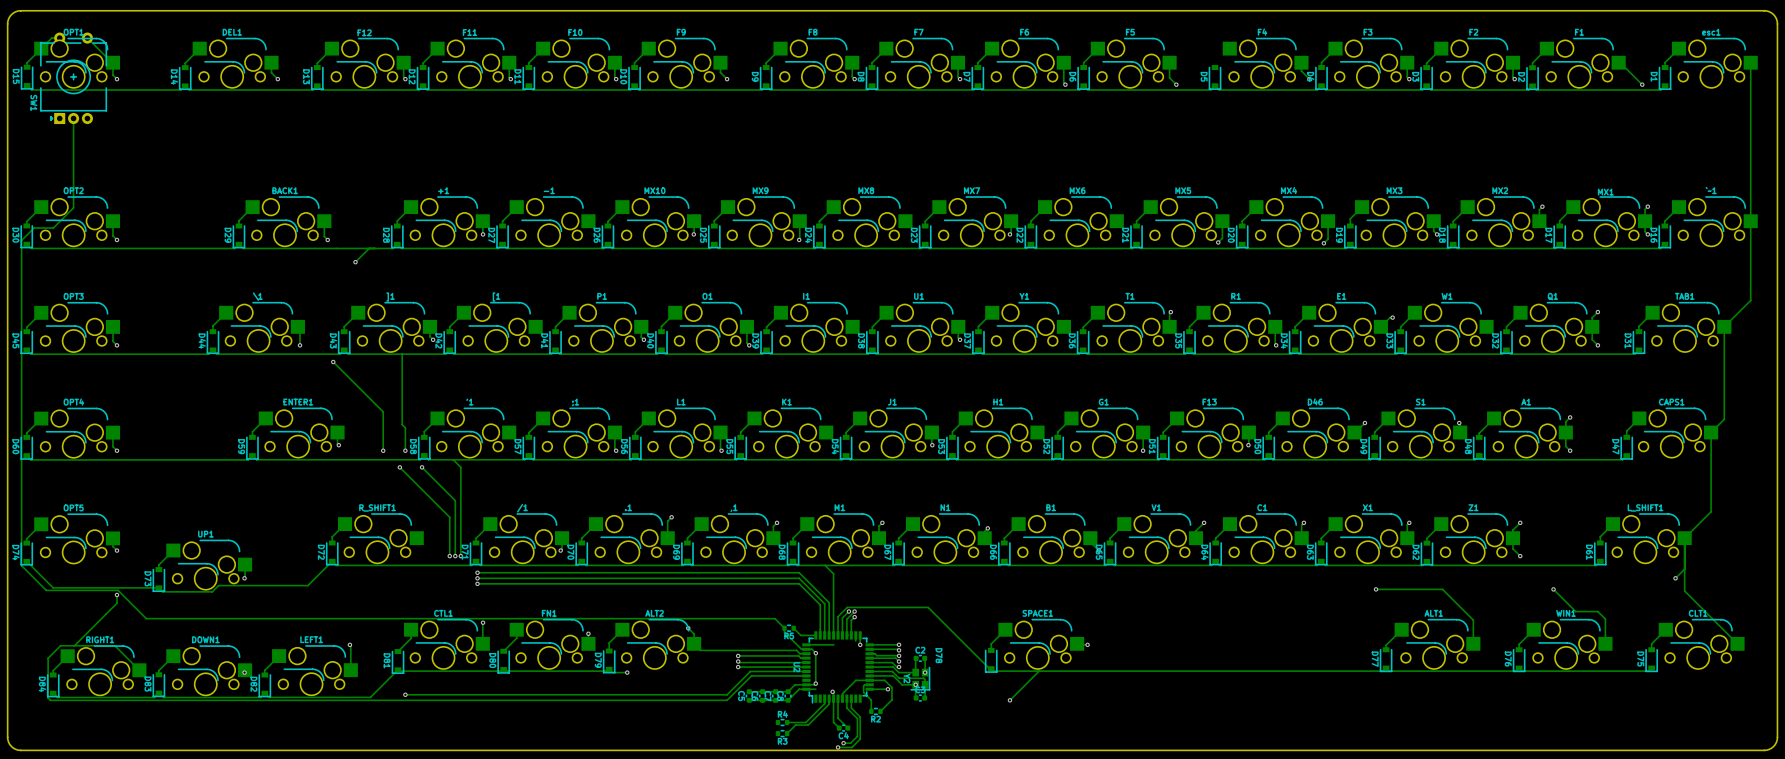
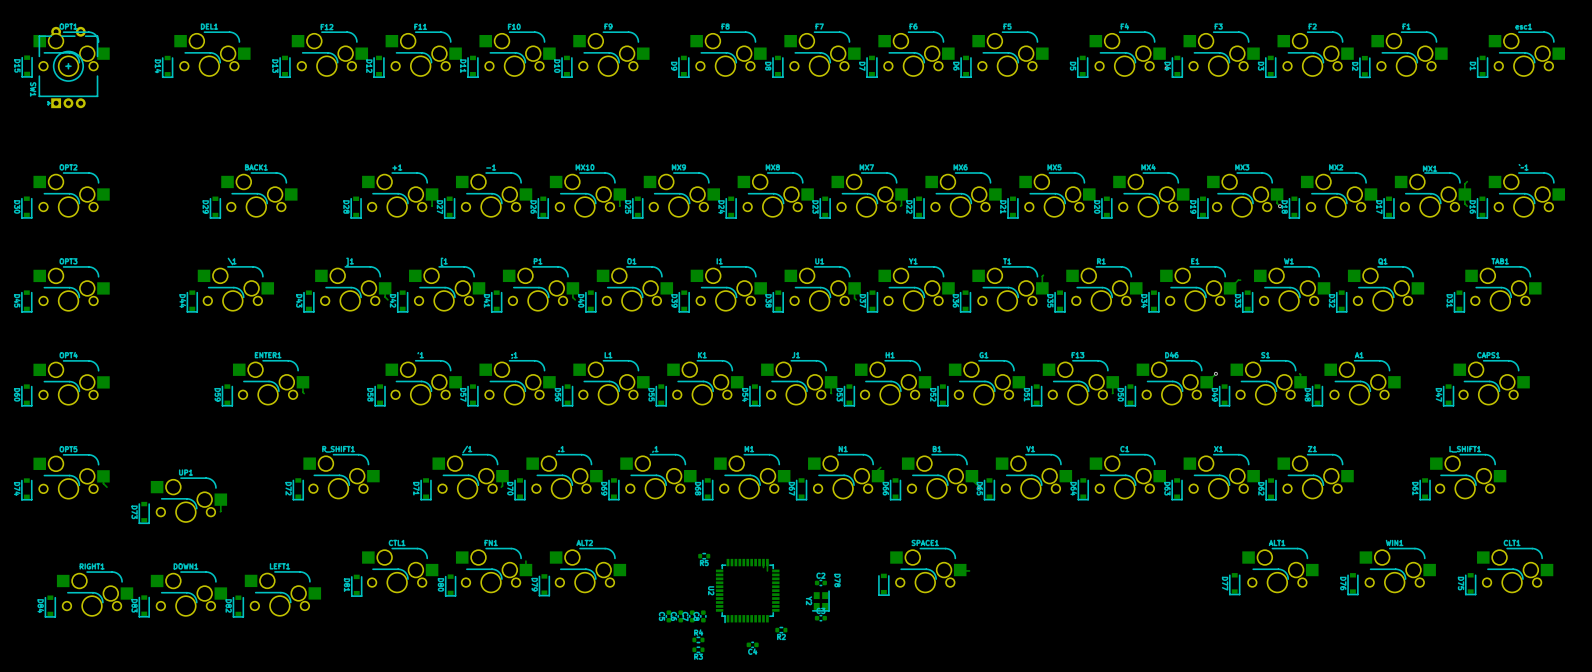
board edge: (1764, 10) (15, 11) (9, 17) (7, 23) (8, 742) (14, 748) (20, 750) (1769, 749) (1774, 745) (1777, 737) (1777, 23) (1773, 14) (1764, 10) -> none
track: (59, 38) (51, 38) (27, 62) (27, 67) -> none
track: (87, 38) (112, 62) (112, 75) (116, 79) -> none
track: (199, 48) (185, 63) (185, 67) -> none
track: (331, 48) (317, 63) (317, 67) -> none
track: (437, 48) (423, 63) (423, 67) -> none
track: (543, 48) (528, 62) (528, 67) -> none
track: (648, 48) (634, 62) (634, 67) -> none
track: (780, 48) (766, 63) (766, 67) -> none
track: (886, 48) (872, 62) (872, 67) -> none
track: (992, 48) (977, 62) (977, 67) -> none
track: (1097, 48) (1083, 62) (1083, 67) -> none
track: (1335, 48) (1321, 62) (1321, 67) -> none
track: (1441, 48) (1426, 63) (1426, 67) -> none
track: (1546, 48) (1532, 63) (1532, 67) -> none
track: (1679, 48) (1665, 62) (1665, 67) -> none
track: (271, 62) (271, 72) (277, 79) -> none
track: (403, 62) (403, 77) (405, 79) -> none
track: (509, 62) (510, 79) -> none
track: (614, 62) (616, 79) -> none
track: (720, 62) (720, 72) (727, 79) -> none
track: (852, 62) (852, 76) (854, 79) -> none
track: (958, 62) (958, 77) (960, 79) -> none
track: (1063, 62) (1065, 84) -> none
track: (1169, 62) (1169, 77) (1176, 84) -> none
track: (1301, 62) (1301, 71) (1309, 79) -> none
track: (1407, 62) (1407, 77) (1409, 79) -> none
track: (1512, 62) (1512, 77) (1514, 79) -> none
track: (1618, 62) (1642, 84) -> none
track: (1750, 62) (1750, 300) (1724, 326) (1724, 419) (1711, 432) (1711, 511) (1684, 538) (1684, 591) (1737, 643) -> none
via: (116, 79) -> none
via: (277, 79) -> none
via: (405, 79) -> none
via: (510, 79) -> none
via: (616, 79) -> none
via: (727, 79) -> none
via: (854, 79) -> none
via: (960, 79) -> none
via: (1409, 79) -> none
via: (1514, 79) -> none
via: (1065, 84) -> none
via: (1176, 84) -> none
via: (1642, 84) -> none
track: (27, 85) (31, 89) (181, 89) (185, 85) (189, 89) (313, 89) (317, 85) (321, 89) (418, 89) (423, 85) (427, 89) (524, 89) (528, 85) (532, 89) (630, 89) (634, 85) (638, 89) (762, 89) (766, 85) (770, 89) (867, 89) (872, 85) (876, 89) (973, 89) (977, 85) (981, 89) (1079, 89) (1083, 85) (1087, 89) (1210, 89) (1215, 85) (1219, 89) (1317, 89) (1321, 85) (1325, 89) (1422, 89) (1426, 85) (1430, 89) (1528, 89) (1532, 86) (1536, 89) (1660, 89) (1665, 85) -> none
track: (73, 118) (73, 207) (53, 228) (34, 228) (21, 240) (21, 565) (46, 590) (118, 590) (146, 618) (774, 618) (784, 628) (784, 632) (801, 649) (811, 649) (815, 653) -> none
track: (1542, 206) (1539, 209) (1539, 221) -> none
via: (1542, 206) -> none
via: (1647, 206) -> none
track: (41, 207) (26, 221) (26, 225) -> none
track: (252, 207) (238, 220) (238, 226) -> none
track: (411, 207) (397, 220) (397, 226) -> none
track: (516, 207) (502, 221) (502, 226) -> none
track: (622, 207) (607, 221) (607, 226) -> none
track: (728, 207) (714, 220) (714, 226) -> none
track: (833, 207) (819, 221) (819, 226) -> none
track: (939, 207) (925, 221) (925, 226) -> none
track: (1045, 207) (1030, 221) (1030, 226) -> none
track: (1150, 207) (1136, 221) (1136, 226) -> none
track: (1256, 207) (1242, 221) (1242, 226) -> none
track: (1362, 207) (1350, 218) (1350, 226) -> none
track: (1467, 207) (1453, 221) (1453, 226) -> none
track: (1573, 207) (1559, 220) (1559, 226) -> none
track: (1679, 207) (1664, 221) (1664, 226) -> none
track: (112, 221) (112, 235) (116, 239) -> none
track: (324, 221) (324, 236) (327, 239) -> none
track: (799, 221) (799, 239) -> none
track: (1222, 221) (1222, 238) (1218, 242) -> none
track: (1328, 221) (1328, 239) (1323, 243) -> none
via: (483, 234) -> none
via: (693, 234) -> none
via: (1009, 234) -> none
via: (1647, 234) -> none
via: (116, 239) -> none
via: (327, 239) -> none
via: (799, 239) -> none
via: (1218, 242) -> none
via: (1323, 243) -> none
track: (26, 244) (30, 248) (234, 248) (238, 244) (243, 248) (393, 248) (397, 244) (401, 248) (498, 248) (502, 244) (506, 248) (603, 248) (607, 244) (612, 248) (710, 248) (714, 244) (718, 248) (815, 248) (819, 244) (823, 248) (921, 248) (925, 244) (929, 248) (1026, 248) (1030, 244) (1035, 248) (1132, 248) (1136, 244) (1140, 248) (1238, 248) (1242, 244) (1246, 248) (1346, 248) (1350, 244) (1354, 248) (1449, 248) (1453, 244) (1457, 248) (1555, 248) (1559, 244) (1563, 248) (1660, 248) (1664, 244) -> none
track: (369, 248) (355, 262) -> none
via: (355, 262) -> none
track: (41, 312) (26, 327) (26, 331) -> none
track: (226, 312) (212, 325) (212, 331) -> none
track: (358, 312) (344, 326) (344, 331) -> none
track: (463, 312) (449, 326) (449, 331) -> none
track: (569, 312) (555, 326) (555, 331) -> none
track: (675, 312) (661, 326) (661, 331) -> none
track: (780, 312) (766, 327) (766, 331) -> none
track: (886, 312) (872, 326) (872, 331) -> none
track: (992, 312) (978, 326) (978, 331) -> none
track: (1097, 312) (1083, 327) (1083, 331) -> none
via: (1170, 312) -> none
track: (1203, 312) (1189, 326) (1189, 331) -> none
track: (1309, 312) (1295, 326) (1295, 331) -> none
track: (1414, 312) (1400, 326) (1400, 331) -> none
track: (1520, 312) (1506, 326) (1506, 331) -> none
track: (1597, 312) (1592, 317) (1592, 339) (1597, 345) -> none
via: (1597, 312) -> none
track: (1652, 312) (1638, 326) (1638, 331) -> none
via: (1392, 317) -> none
track: (112, 326) (112, 341) (116, 345) -> none
track: (297, 326) (300, 328) (300, 345) -> none
track: (746, 326) (746, 343) (749, 345) -> none
track: (1275, 326) (1276, 345) -> none
via: (433, 339) -> none
via: (643, 339) -> none
via: (960, 339) -> none
via: (116, 345) -> none
via: (300, 345) -> none
via: (749, 345) -> none
via: (1276, 345) -> none
via: (1597, 345) -> none
track: (1638, 349) (1634, 354) (1510, 354) (1506, 349) (1502, 354) (1404, 354) (1400, 349) (1396, 354) (1299, 354) (1295, 349) (1291, 354) (1193, 354) (1189, 349) (1185, 354) (1087, 354) (1083, 349) (1078, 354) (982, 354) (978, 349) (974, 354) (876, 354) (872, 349) (868, 354) (770, 354) (766, 349) (762, 354) (665, 354) (661, 349) (657, 354) (559, 354) (555, 349) (551, 354) (453, 354) (449, 349) (445, 354) (348, 354) (344, 349) (340, 354) (217, 354) (212, 349) (208, 354) (30, 354) (26, 349) -> none
track: (402, 354) (402, 424) (405, 427) (405, 450) -> none
track: (333, 361) (383, 411) (383, 450) -> none
via: (333, 361) -> none
track: (1570, 417) (1565, 421) (1565, 446) (1570, 450) -> none
via: (1570, 417) -> none
track: (41, 418) (26, 433) (26, 437) -> none
track: (265, 418) (252, 431) (252, 437) -> none
track: (437, 418) (424, 431) (424, 437) -> none
track: (543, 418) (528, 432) (528, 437) -> none
track: (648, 418) (635, 431) (635, 437) -> none
track: (754, 418) (740, 432) (740, 437) -> none
track: (860, 418) (846, 432) (846, 437) -> none
track: (965, 418) (952, 431) (952, 437) -> none
track: (1071, 418) (1057, 432) (1057, 437) -> none
track: (1177, 418) (1163, 432) (1163, 437) -> none
track: (1282, 418) (1268, 432) (1268, 437) -> none
track: (1388, 418) (1374, 432) (1374, 437) -> none
track: (1494, 418) (1479, 433) (1479, 437) -> none
track: (1639, 418) (1626, 431) (1626, 437) -> none
via: (1459, 423) -> none
track: (112, 432) (112, 446) (116, 450) -> none
track: (614, 432) (616, 450) -> none
track: (720, 432) (721, 450) -> none
track: (1143, 432) (1143, 450) -> none
via: (338, 445) -> none
via: (932, 445) -> none
via: (1248, 445) -> none
via: (116, 450) -> none
via: (383, 450) -> none
via: (405, 450) -> none
via: (616, 450) -> none
via: (721, 450) -> none
via: (1143, 450) -> none
via: (1570, 450) -> none
track: (1626, 455) (1622, 459) (1483, 459) (1479, 455) (1475, 459) (1378, 459) (1374, 455) (1370, 459) (1272, 459) (1268, 455) (1264, 459) (1167, 459) (1163, 455) (1159, 459) (1061, 459) (1057, 455) (1053, 459) (956, 459) (952, 455) (948, 459) (850, 459) (846, 455) (841, 459) (744, 459) (740, 455) (736, 459) (639, 459) (635, 455) (631, 459) (532, 459) (528, 455) (524, 459) (428, 459) (424, 455) (420, 459) (256, 459) (252, 455) (248, 459) (30, 459) (26, 455) -> none
track: (453, 459) (460, 467) (460, 556) -> none
track: (399, 467) (449, 517) (449, 556) -> none
via: (399, 467) -> none
track: (422, 467) (455, 500) (455, 556) -> none
via: (422, 467) -> none
track: (671, 517) (667, 521) (667, 538) -> none
via: (671, 517) -> none
track: (777, 522) (773, 526) (773, 538) -> none
via: (777, 522) -> none
track: (882, 522) (879, 526) (879, 538) -> none
via: (882, 522) -> none
track: (1204, 522) (1196, 530) (1196, 538) -> none
via: (1204, 522) -> none
track: (1303, 522) (1301, 525) (1301, 538) -> none
via: (1303, 522) -> none
track: (1409, 522) (1407, 524) (1407, 538) -> none
via: (1409, 522) -> none
track: (1520, 522) (1512, 530) (1512, 548) (1520, 556) -> none
via: (1520, 522) -> none
track: (41, 524) (26, 538) (26, 543) -> none
track: (345, 524) (332, 536) (332, 543) -> none
track: (490, 524) (476, 538) (476, 543) -> none
track: (595, 524) (581, 538) (581, 543) -> none
track: (701, 524) (687, 538) (687, 543) -> none
track: (807, 524) (793, 538) (793, 543) -> none
track: (912, 524) (898, 538) (898, 543) -> none
track: (1018, 524) (1004, 538) (1004, 543) -> none
track: (1124, 524) (1110, 538) (1110, 543) -> none
track: (1229, 524) (1215, 538) (1215, 543) -> none
track: (1335, 524) (1321, 538) (1321, 543) -> none
track: (1441, 524) (1426, 538) (1426, 543) -> none
track: (1612, 524) (1600, 536) (1600, 543) -> none
via: (987, 528) -> none
via: (116, 550) -> none
track: (173, 550) (158, 564) (158, 569) -> none
via: (560, 550) -> none
via: (449, 556) -> none
via: (455, 556) -> none
via: (460, 556) -> none
via: (1520, 556) -> none
track: (1600, 561) (1596, 565) (1430, 565) (1426, 561) (1422, 565) (1325, 565) (1321, 561) (1317, 565) (1219, 565) (1215, 561) (1211, 565) (1114, 565) (1110, 561) (1105, 565) (1008, 565) (1004, 561) (1000, 565) (902, 565) (898, 561) (894, 565) (797, 565) (793, 561) (788, 565) (691, 565) (687, 561) (683, 565) (585, 565) (581, 561) (577, 565) (480, 565) (476, 561) (471, 565) (336, 565) (332, 561) (307, 585) (218, 585) (212, 591) (162, 591) (158, 587) (53, 587) (26, 561) -> none
track: (825, 565) (833, 573) (833, 635) -> none
track: (1684, 569) (1675, 578) -> none
track: (477, 572) (799, 572) (829, 602) (829, 635) -> none
via: (477, 572) -> none
via: (244, 578) -> none
track: (477, 578) (799, 578) (824, 603) (824, 635) -> none
via: (477, 578) -> none
via: (1675, 578) -> none
track: (477, 583) (799, 583) (820, 604) (820, 635) -> none
via: (477, 583) -> none
track: (1376, 589) (1442, 589) (1473, 620) (1473, 643) -> none
via: (1376, 589) -> none
track: (1553, 589) (1575, 611) (1597, 611) (1605, 619) (1605, 643) -> none
via: (1553, 589) -> none
track: (116, 594) (116, 603) (74, 645) -> none
via: (116, 594) -> none
track: (848, 611) (842, 617) (842, 635) -> none
via: (848, 611) -> none
track: (854, 611) (846, 619) (848, 634) -> none
via: (854, 611) -> none
track: (854, 617) (851, 620) (851, 635) -> none
via: (854, 617) -> none
track: (483, 622) (482, 643) -> none
via: (483, 622) -> none
track: (688, 628) (694, 634) (694, 643) (700, 650) (796, 650) (799, 653) (806, 653) -> none
via: (688, 628) -> none
track: (793, 628) (800, 635) (815, 635) -> none
track: (411, 629) (411, 638) (398, 651) -> none
track: (516, 629) (516, 638) (503, 651) -> none
track: (622, 629) (609, 642) (609, 651) -> none
track: (1005, 629) (991, 643) (991, 650) -> none
track: (1401, 629) (1386, 645) (1386, 649) -> none
track: (1533, 629) (1519, 644) (1519, 649) -> none
track: (1665, 629) (1651, 643) (1651, 649) -> none
via: (588, 633) -> none
track: (838, 635) (838, 616) (847, 607) (928, 607) (993, 671) (1383, 671) (1386, 668) (1389, 671) (1516, 671) (1519, 668) (1522, 671) (1648, 671) (1651, 668) -> none
track: (349, 644) (350, 670) -> none
via: (349, 644) -> none
track: (833, 644) (806, 644) -> none
via: (860, 644) -> none
track: (898, 644) (869, 644) -> none
via: (899, 644) -> none
via: (1087, 644) -> none
track: (869, 649) (899, 650) -> none
via: (899, 650) -> none
track: (815, 653) (814, 684) (795, 684) (788, 691) (749, 691) -> none
via: (815, 653) -> none
track: (869, 653) (899, 655) -> none
track: (738, 655) (798, 655) (800, 658) (806, 658) -> none
via: (738, 655) -> none
via: (899, 655) -> none
track: (67, 656) (53, 670) (53, 674) -> none
track: (173, 656) (158, 670) (158, 674) -> none
track: (279, 656) (264, 670) (264, 674) -> none
track: (869, 658) (895, 658) (899, 661) -> none
track: (916, 658) (915, 672) (898, 672) (893, 667) (869, 667) -> none
track: (924, 658) (925, 672) -> none
track: (738, 661) (806, 662) -> none
via: (738, 661) -> none
via: (899, 661) -> none
track: (869, 662) (892, 662) (899, 667) -> none
via: (738, 667) -> none
track: (806, 667) (738, 667) -> none
via: (899, 667) -> none
track: (139, 670) (114, 645) (60, 645) (48, 658) (48, 698) (50, 700) (727, 700) (751, 675) (806, 675) -> none
track: (806, 671) (750, 671) (727, 694) (405, 694) -> none
track: (869, 671) (892, 671) (899, 678) (923, 678) (924, 698) -> none
track: (1039, 671) (1009, 700) -> none
via: (244, 672) -> none
track: (627, 672) (612, 672) (609, 669) (607, 671) (398, 669) (370, 697) (268, 697) (264, 693) (260, 697) (163, 697) (158, 693) (154, 697) (57, 697) (53, 693) -> none
via: (627, 672) -> none
via: (925, 672) -> none
track: (869, 675) (893, 675) (902, 684) (915, 684) (916, 698) -> none
via: (815, 683) -> none
track: (869, 684) (863, 685) (863, 692) (871, 700) (871, 711) -> none
via: (915, 684) -> none
track: (815, 689) (799, 689) (788, 700) (749, 700) -> none
track: (887, 689) (869, 689) -> none
via: (887, 689) -> none
track: (832, 691) (833, 722) (839, 728) -> none
via: (832, 691) -> none
via: (405, 694) -> none
track: (824, 698) (824, 703) (805, 722) (787, 722) -> none
track: (829, 698) (829, 704) (808, 725) (795, 725) (787, 733) -> none
track: (838, 698) (838, 718) (847, 728) -> none
track: (842, 698) (842, 693) (855, 680) (884, 680) (891, 687) (891, 699) (880, 711) -> none
track: (846, 698) (846, 708) (857, 718) (857, 736) (850, 743) (843, 743) -> none
track: (851, 698) (851, 708) (860, 716) (860, 739) (851, 747) (838, 747) -> none
via: (1009, 700) -> none
via: (843, 743) -> none
via: (838, 747) -> none

